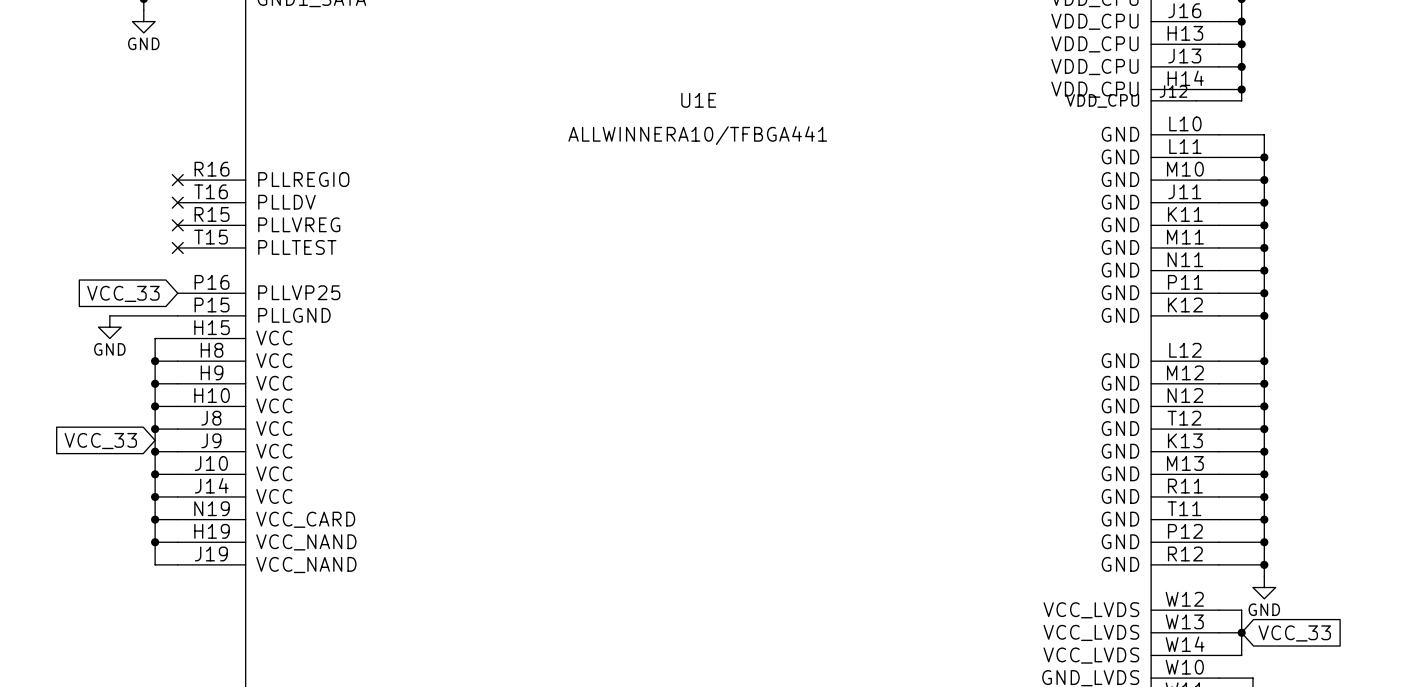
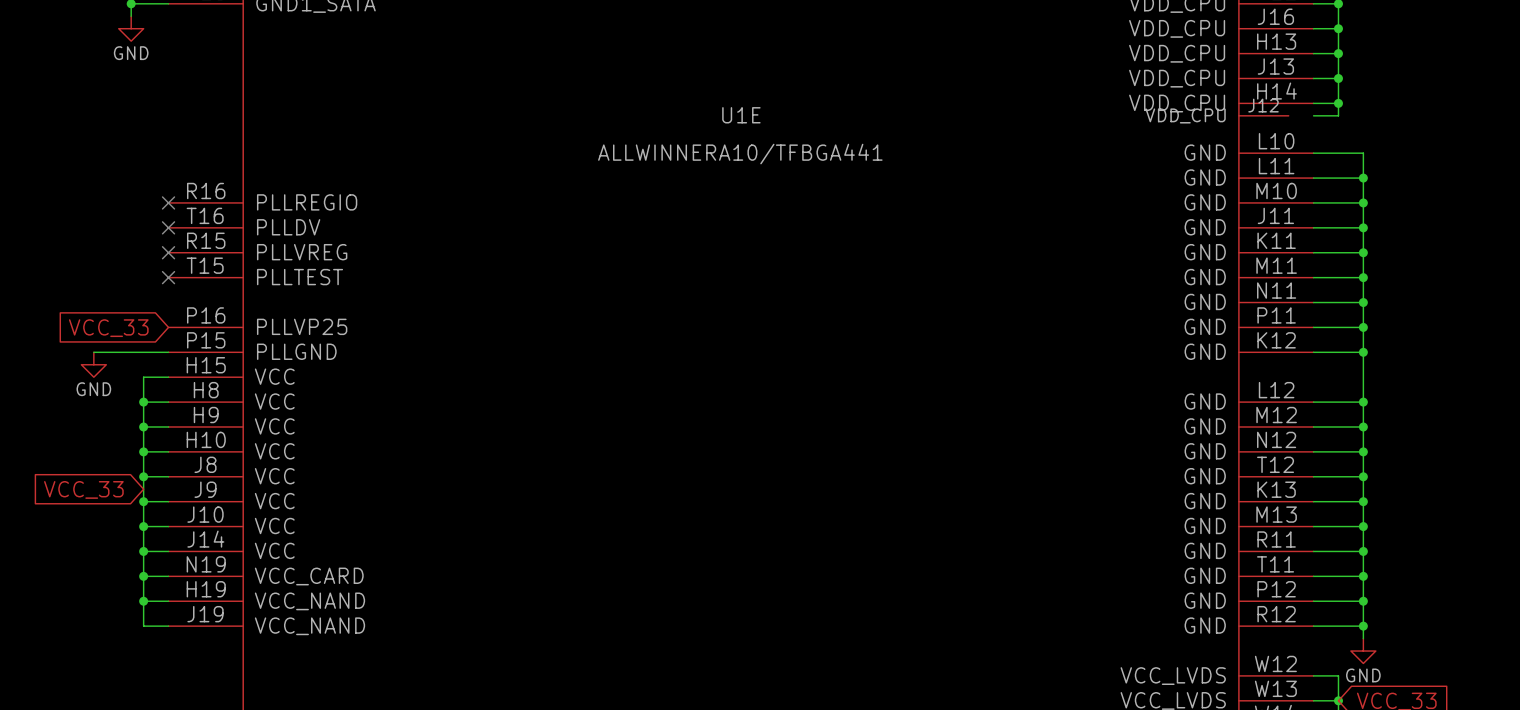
wire: (1196, 100) (1219, 100) -> none

